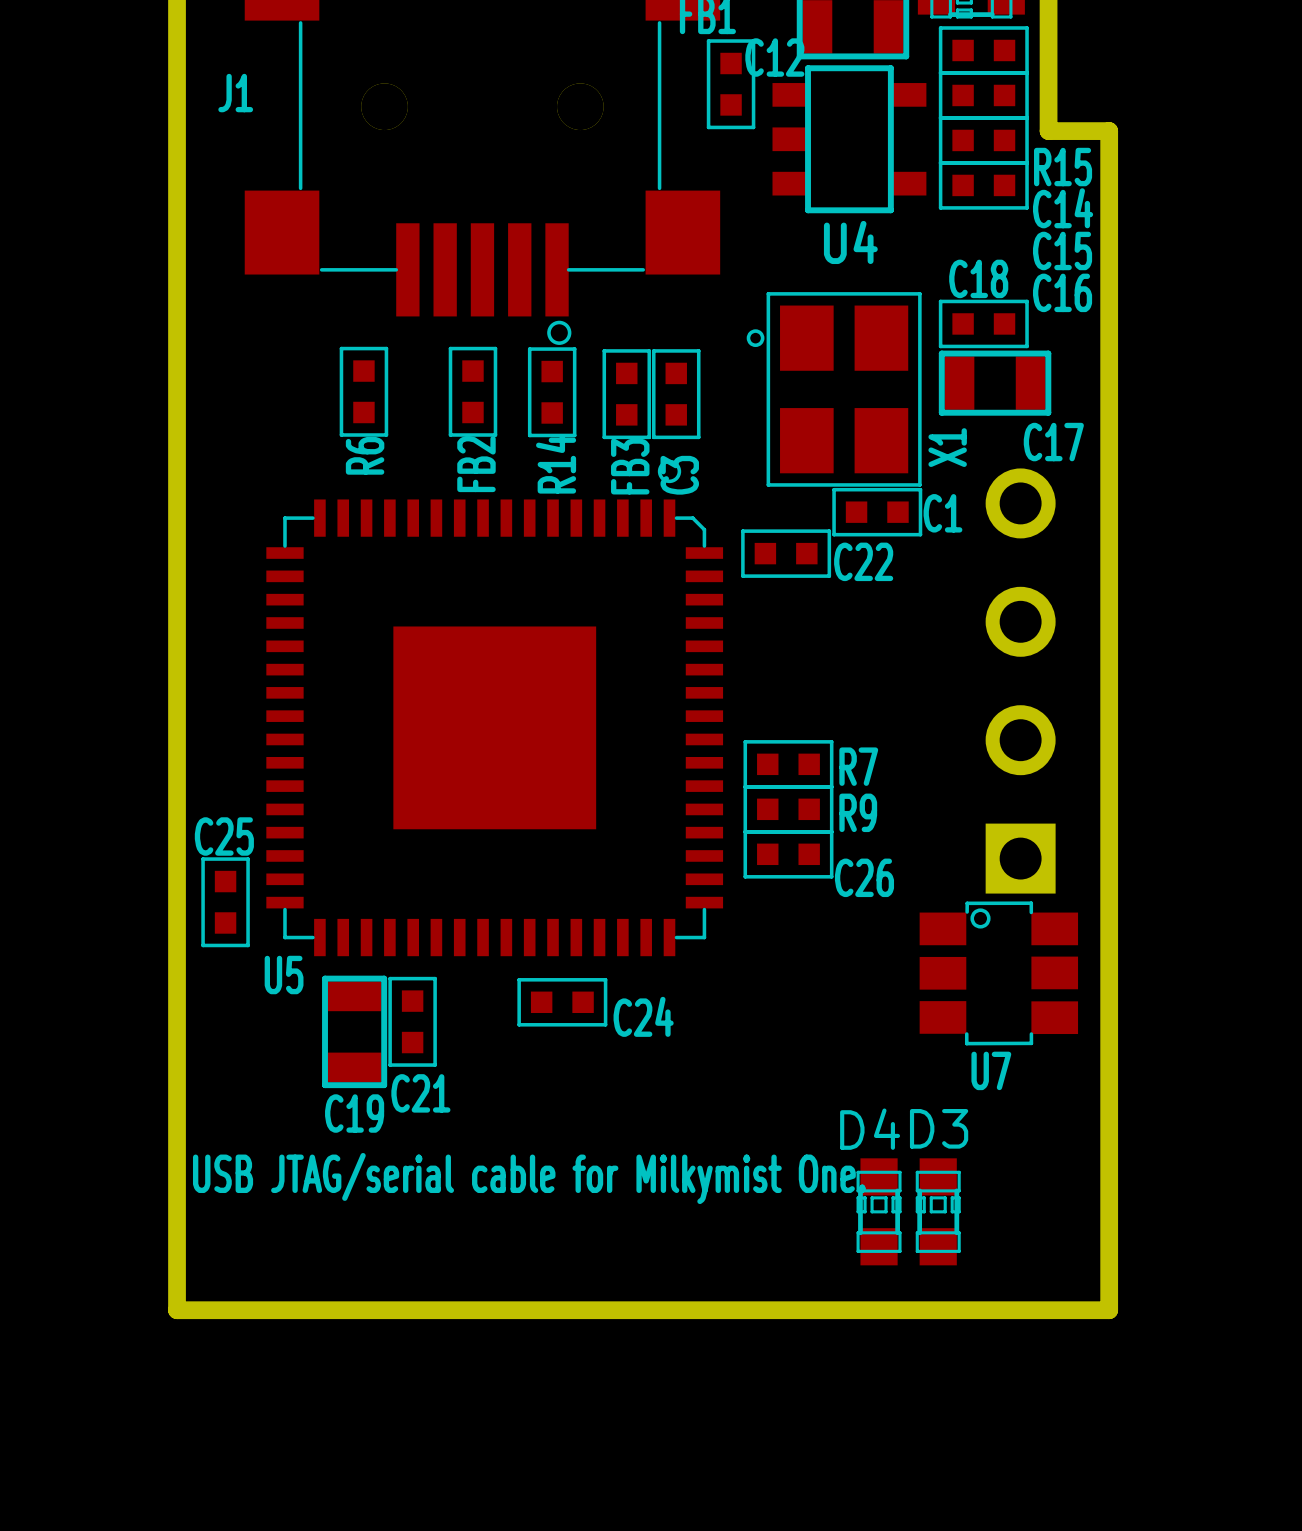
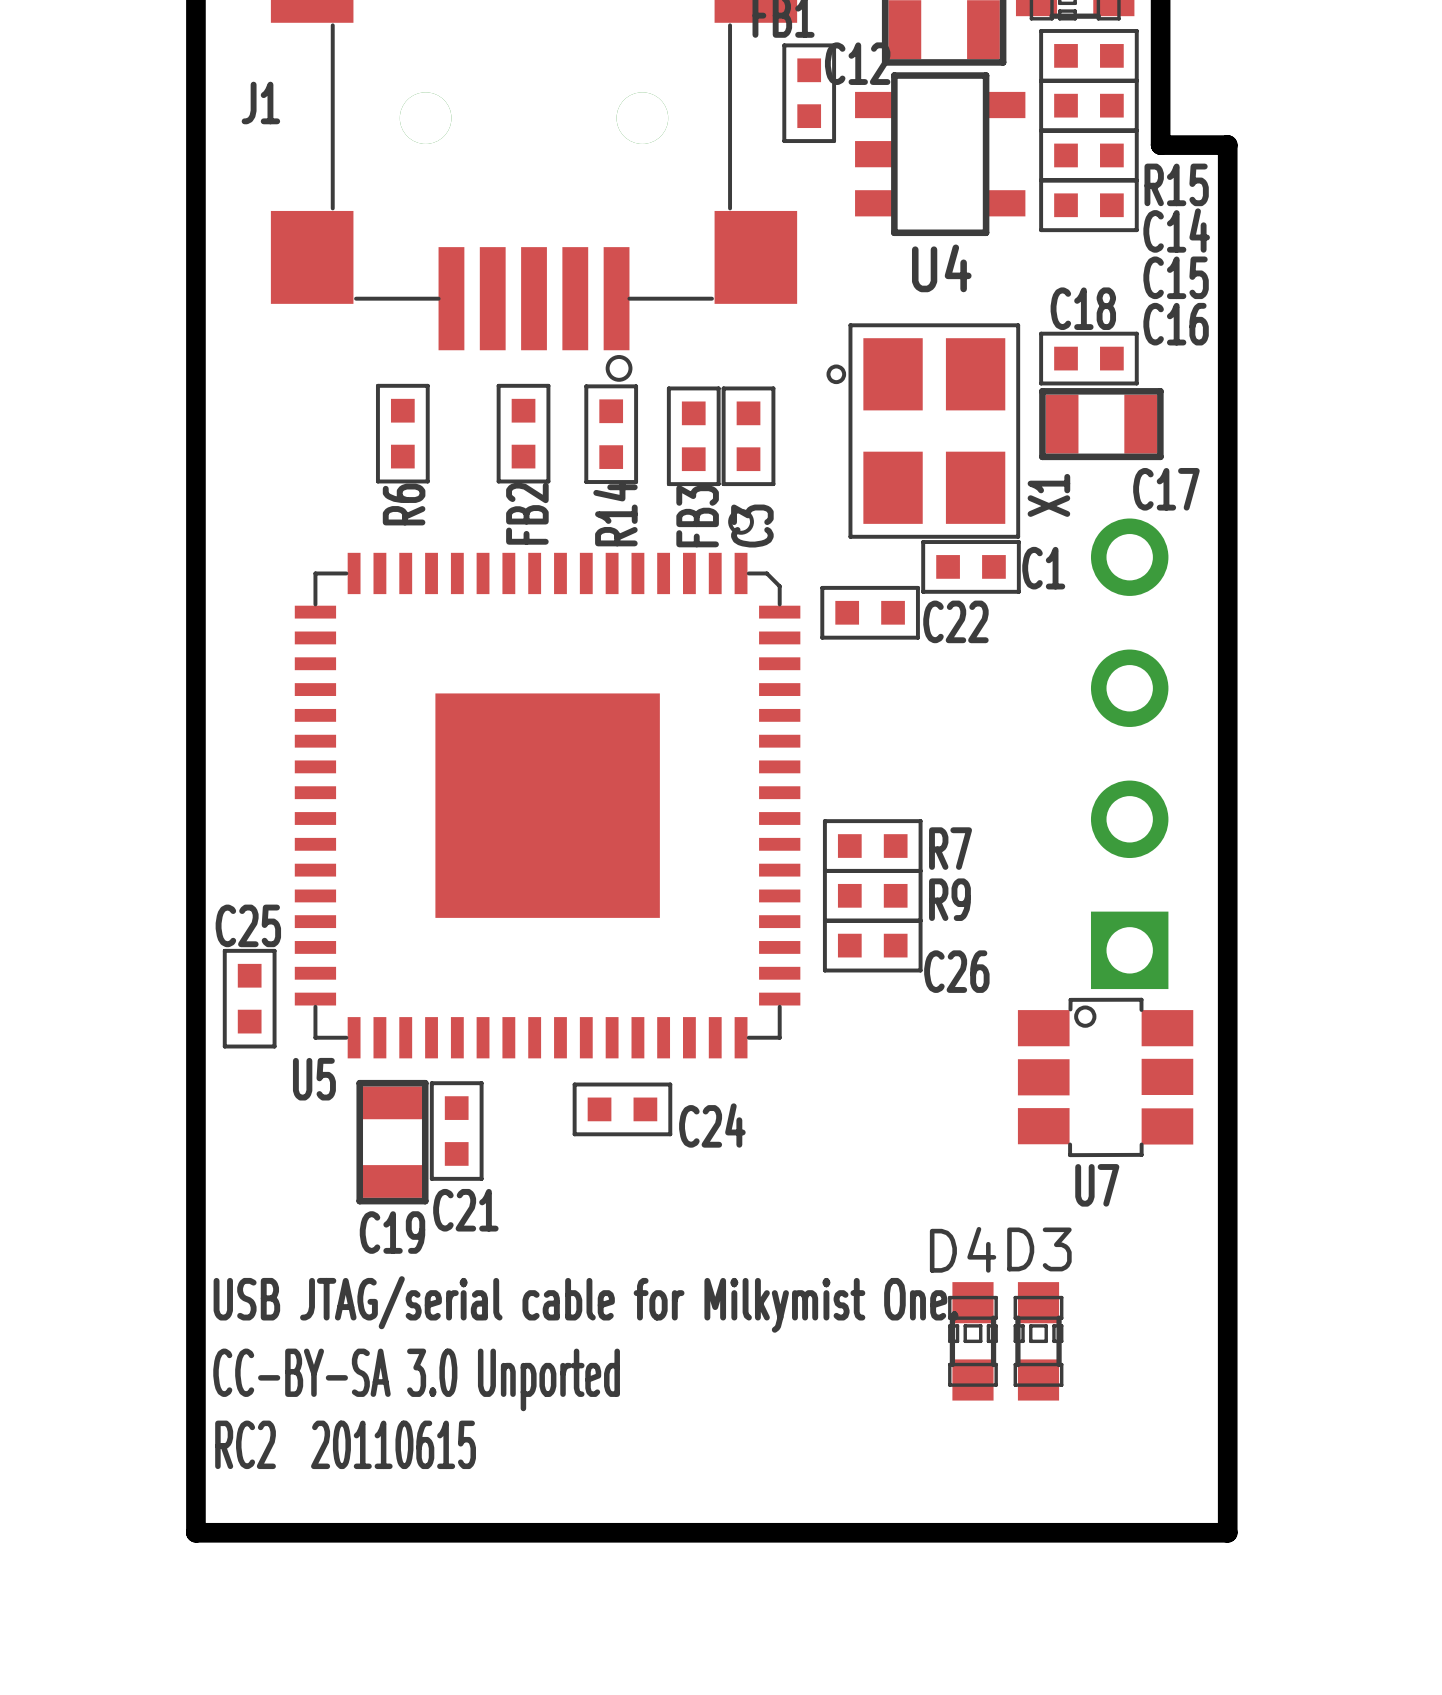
text: none -> CC-BY-SA 3.0 Unported (416, 1379)
text: none -> RC2 20110615 (345, 1444)
board edge: (177, 1310) (1109, 1310) -> (195, 1450) (195, 1532) (1227, 1532) (1227, 1450)

